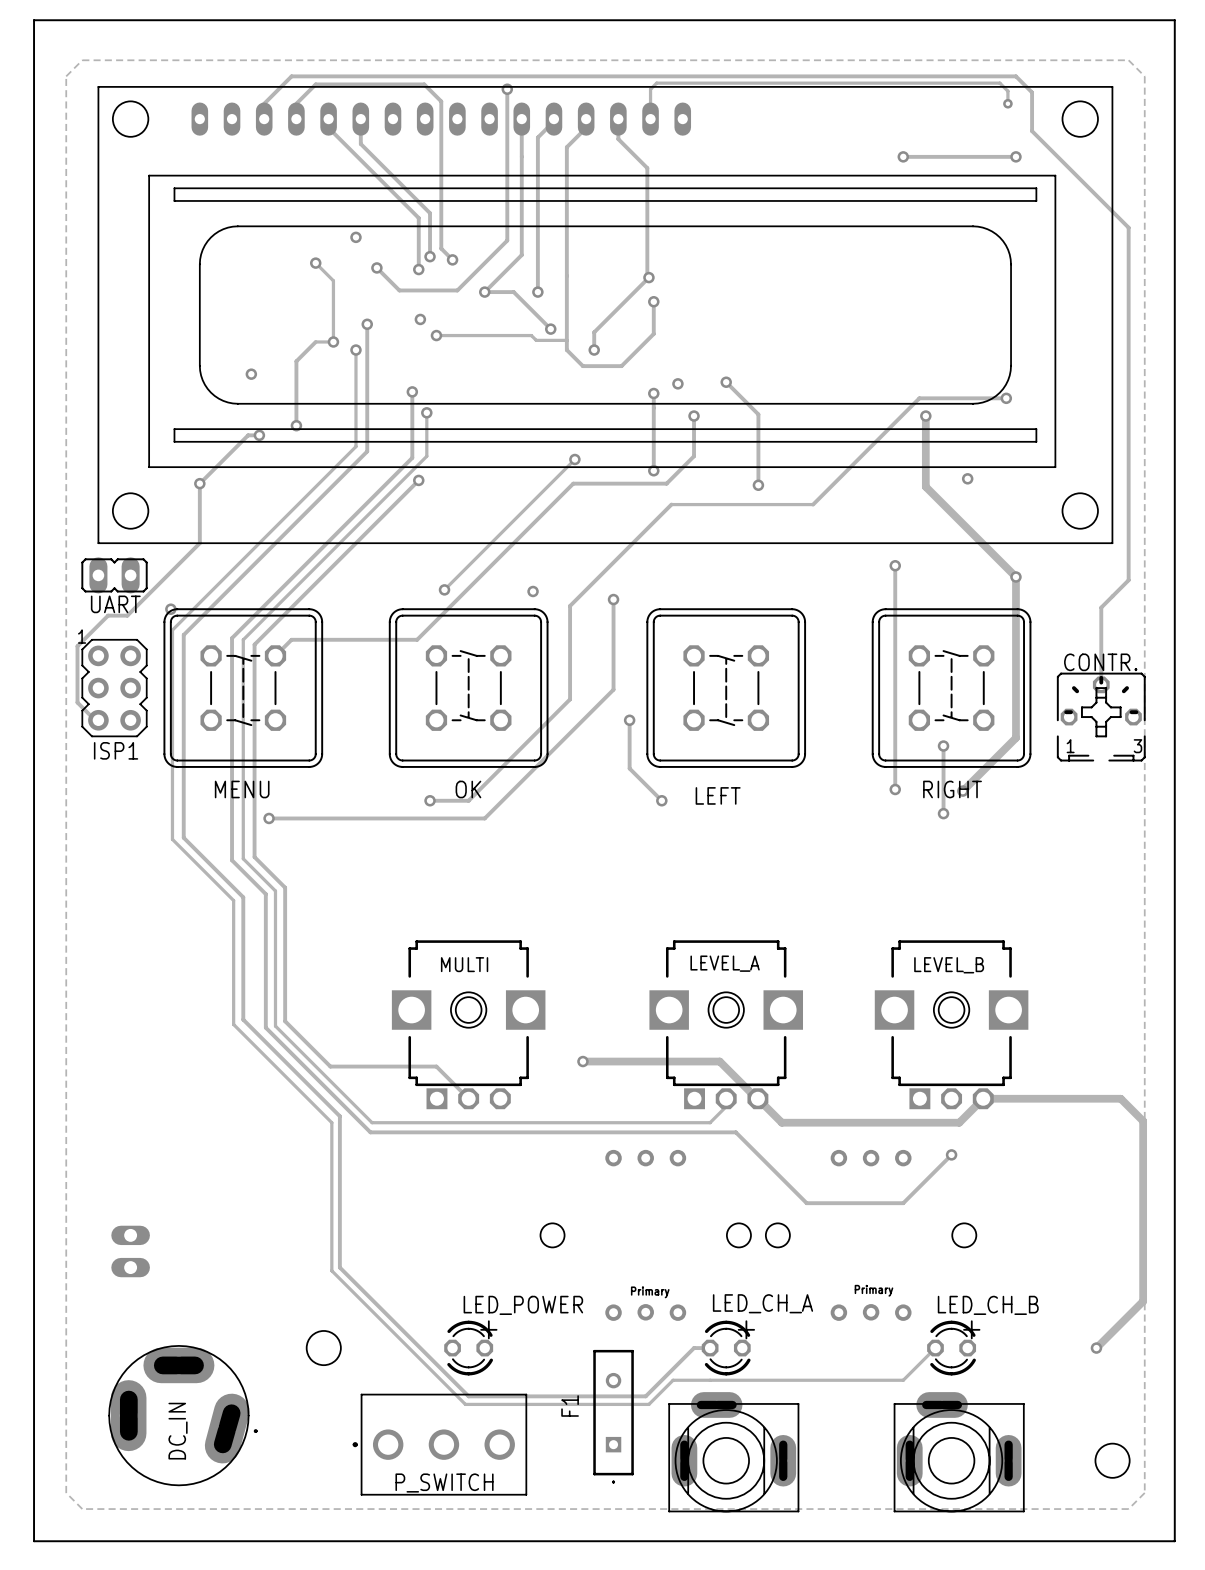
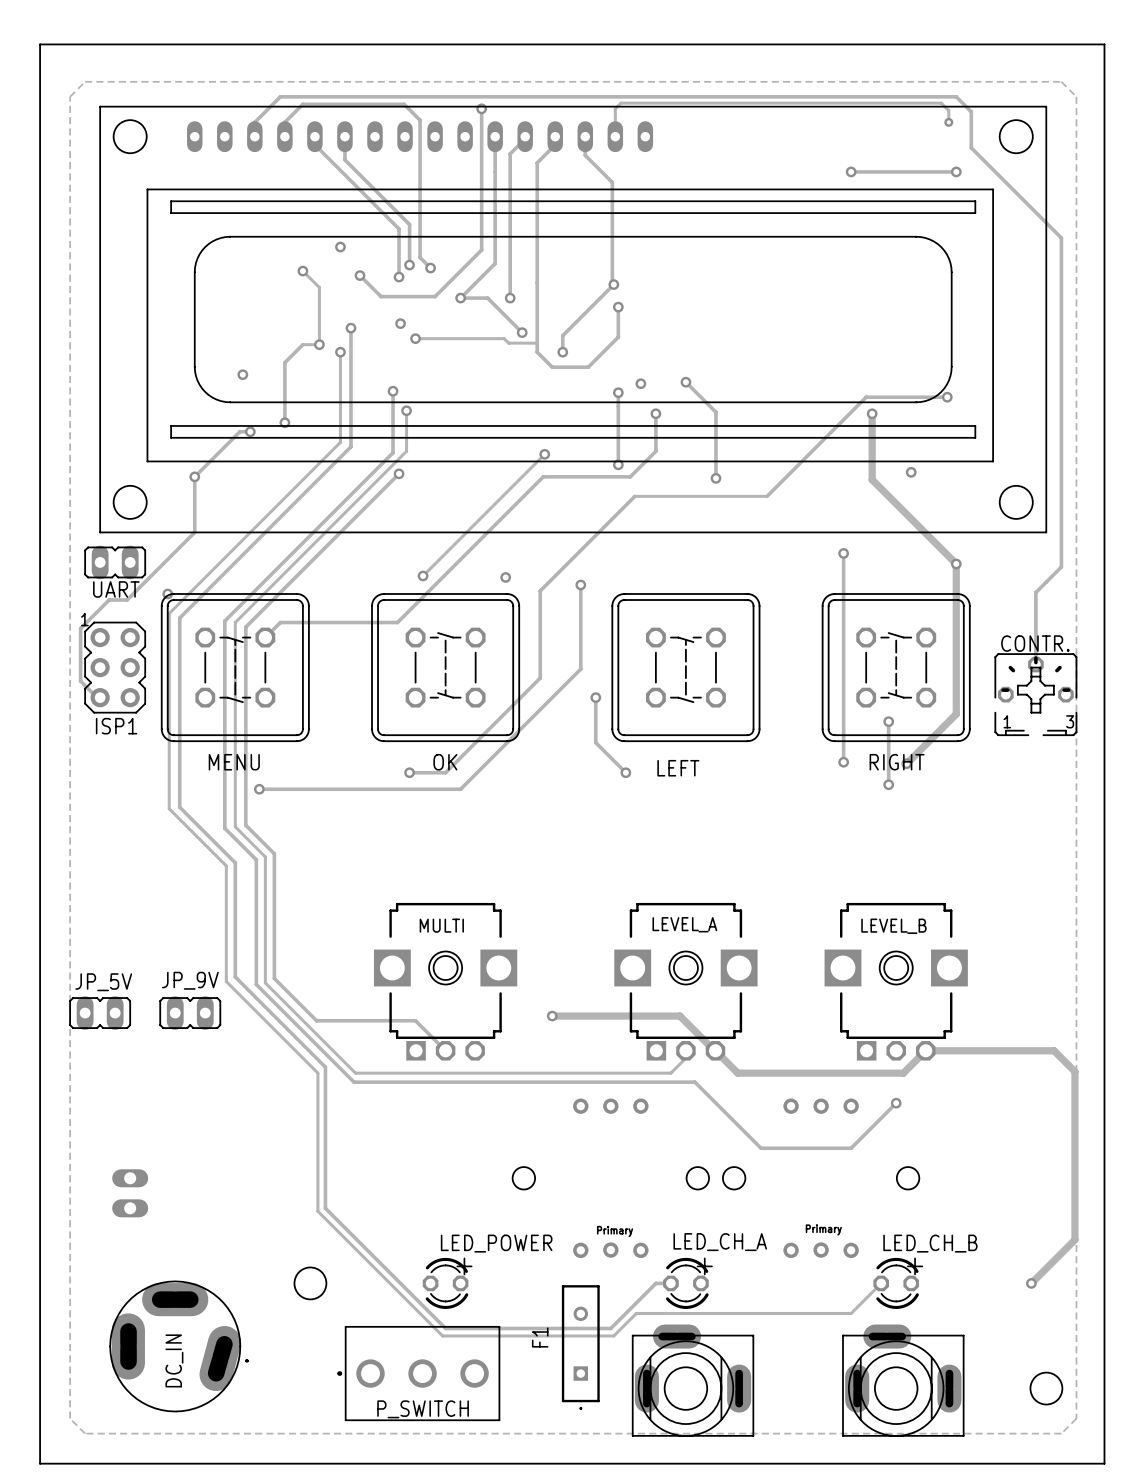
JP_5V: none -> (100, 1013)
JP_9V: none -> (190, 1013)

